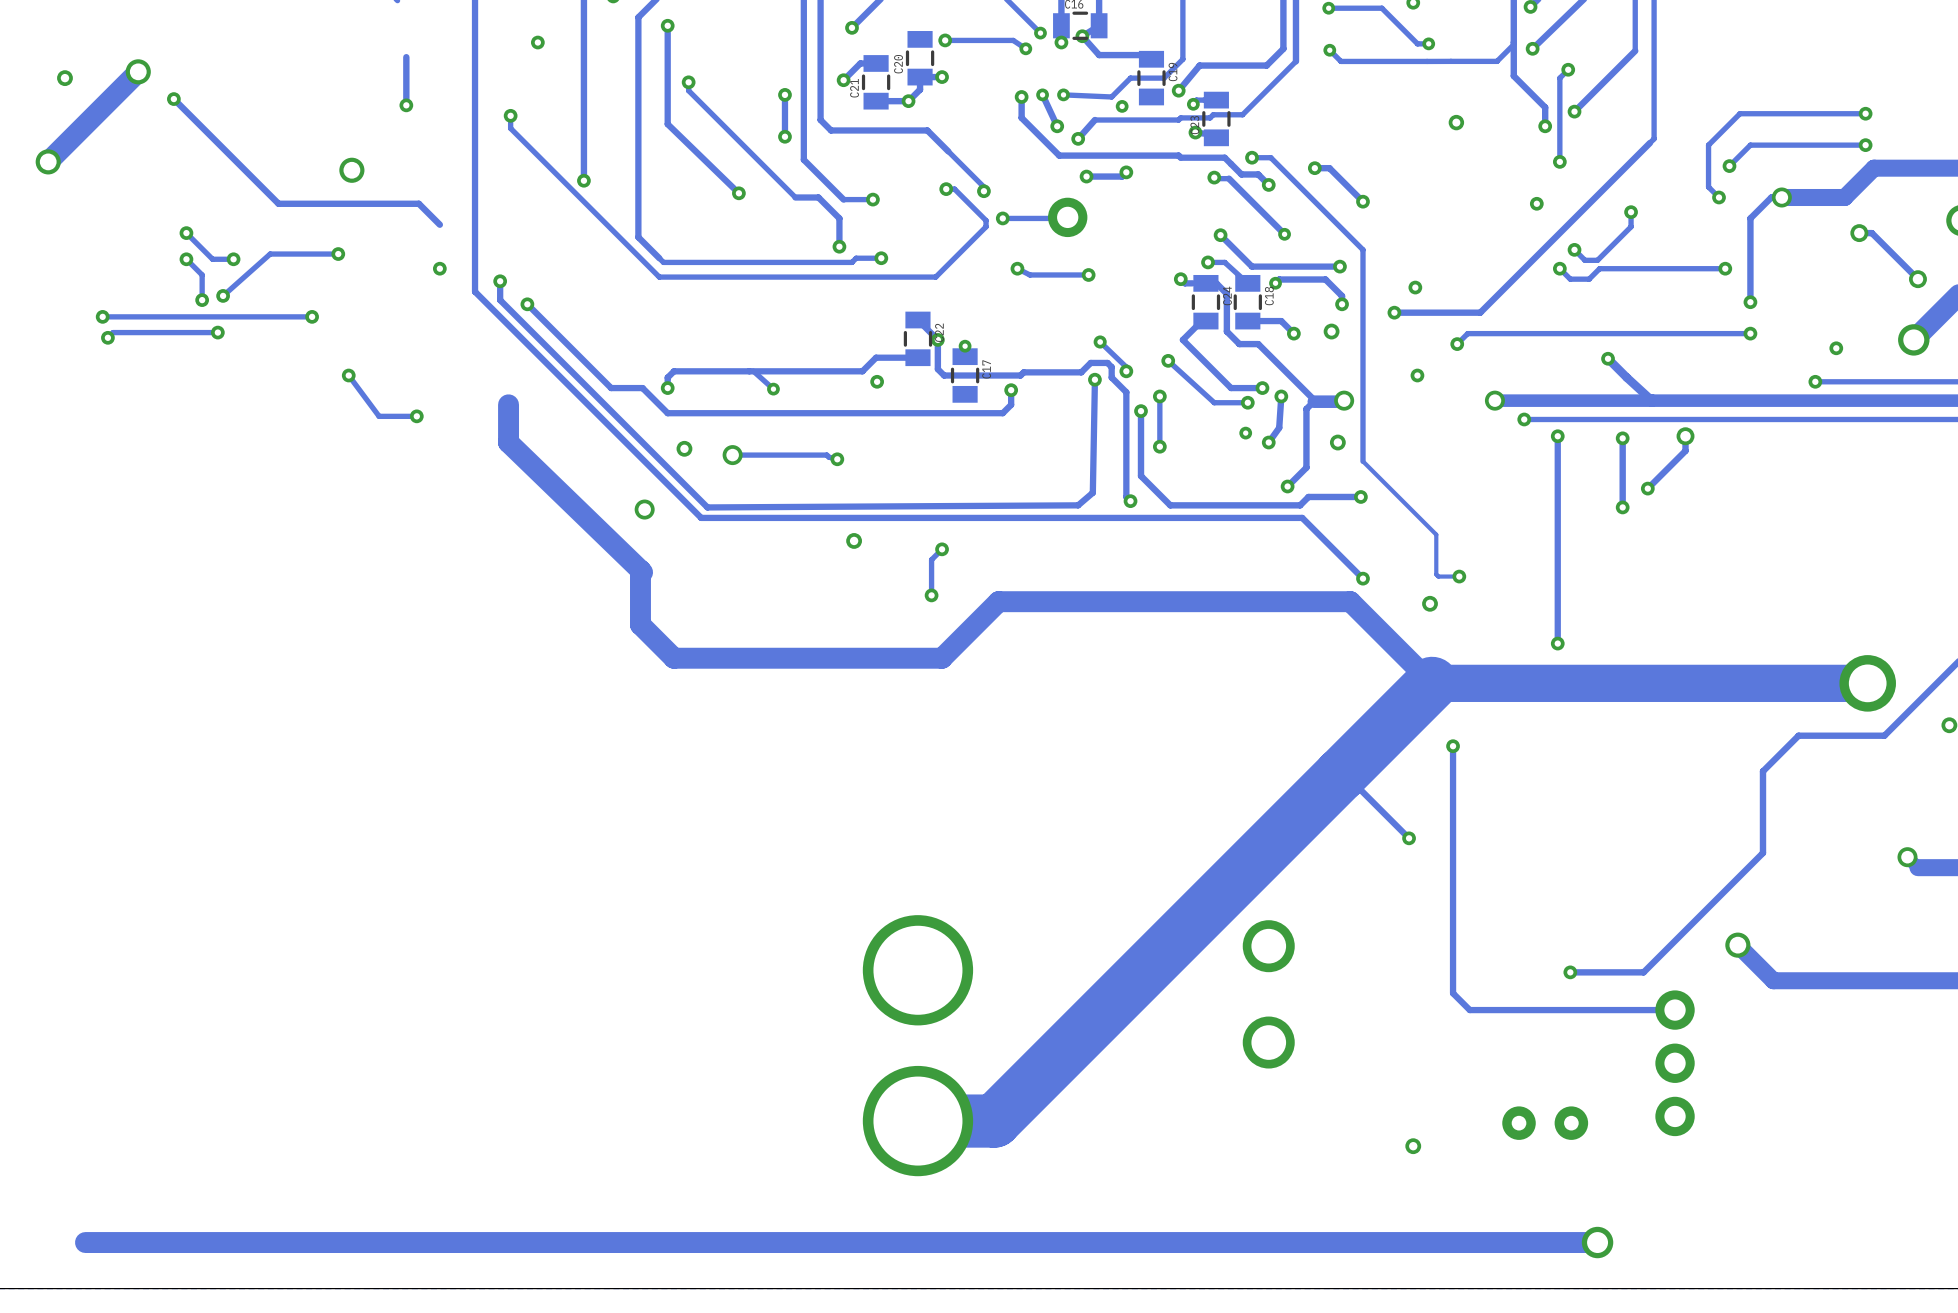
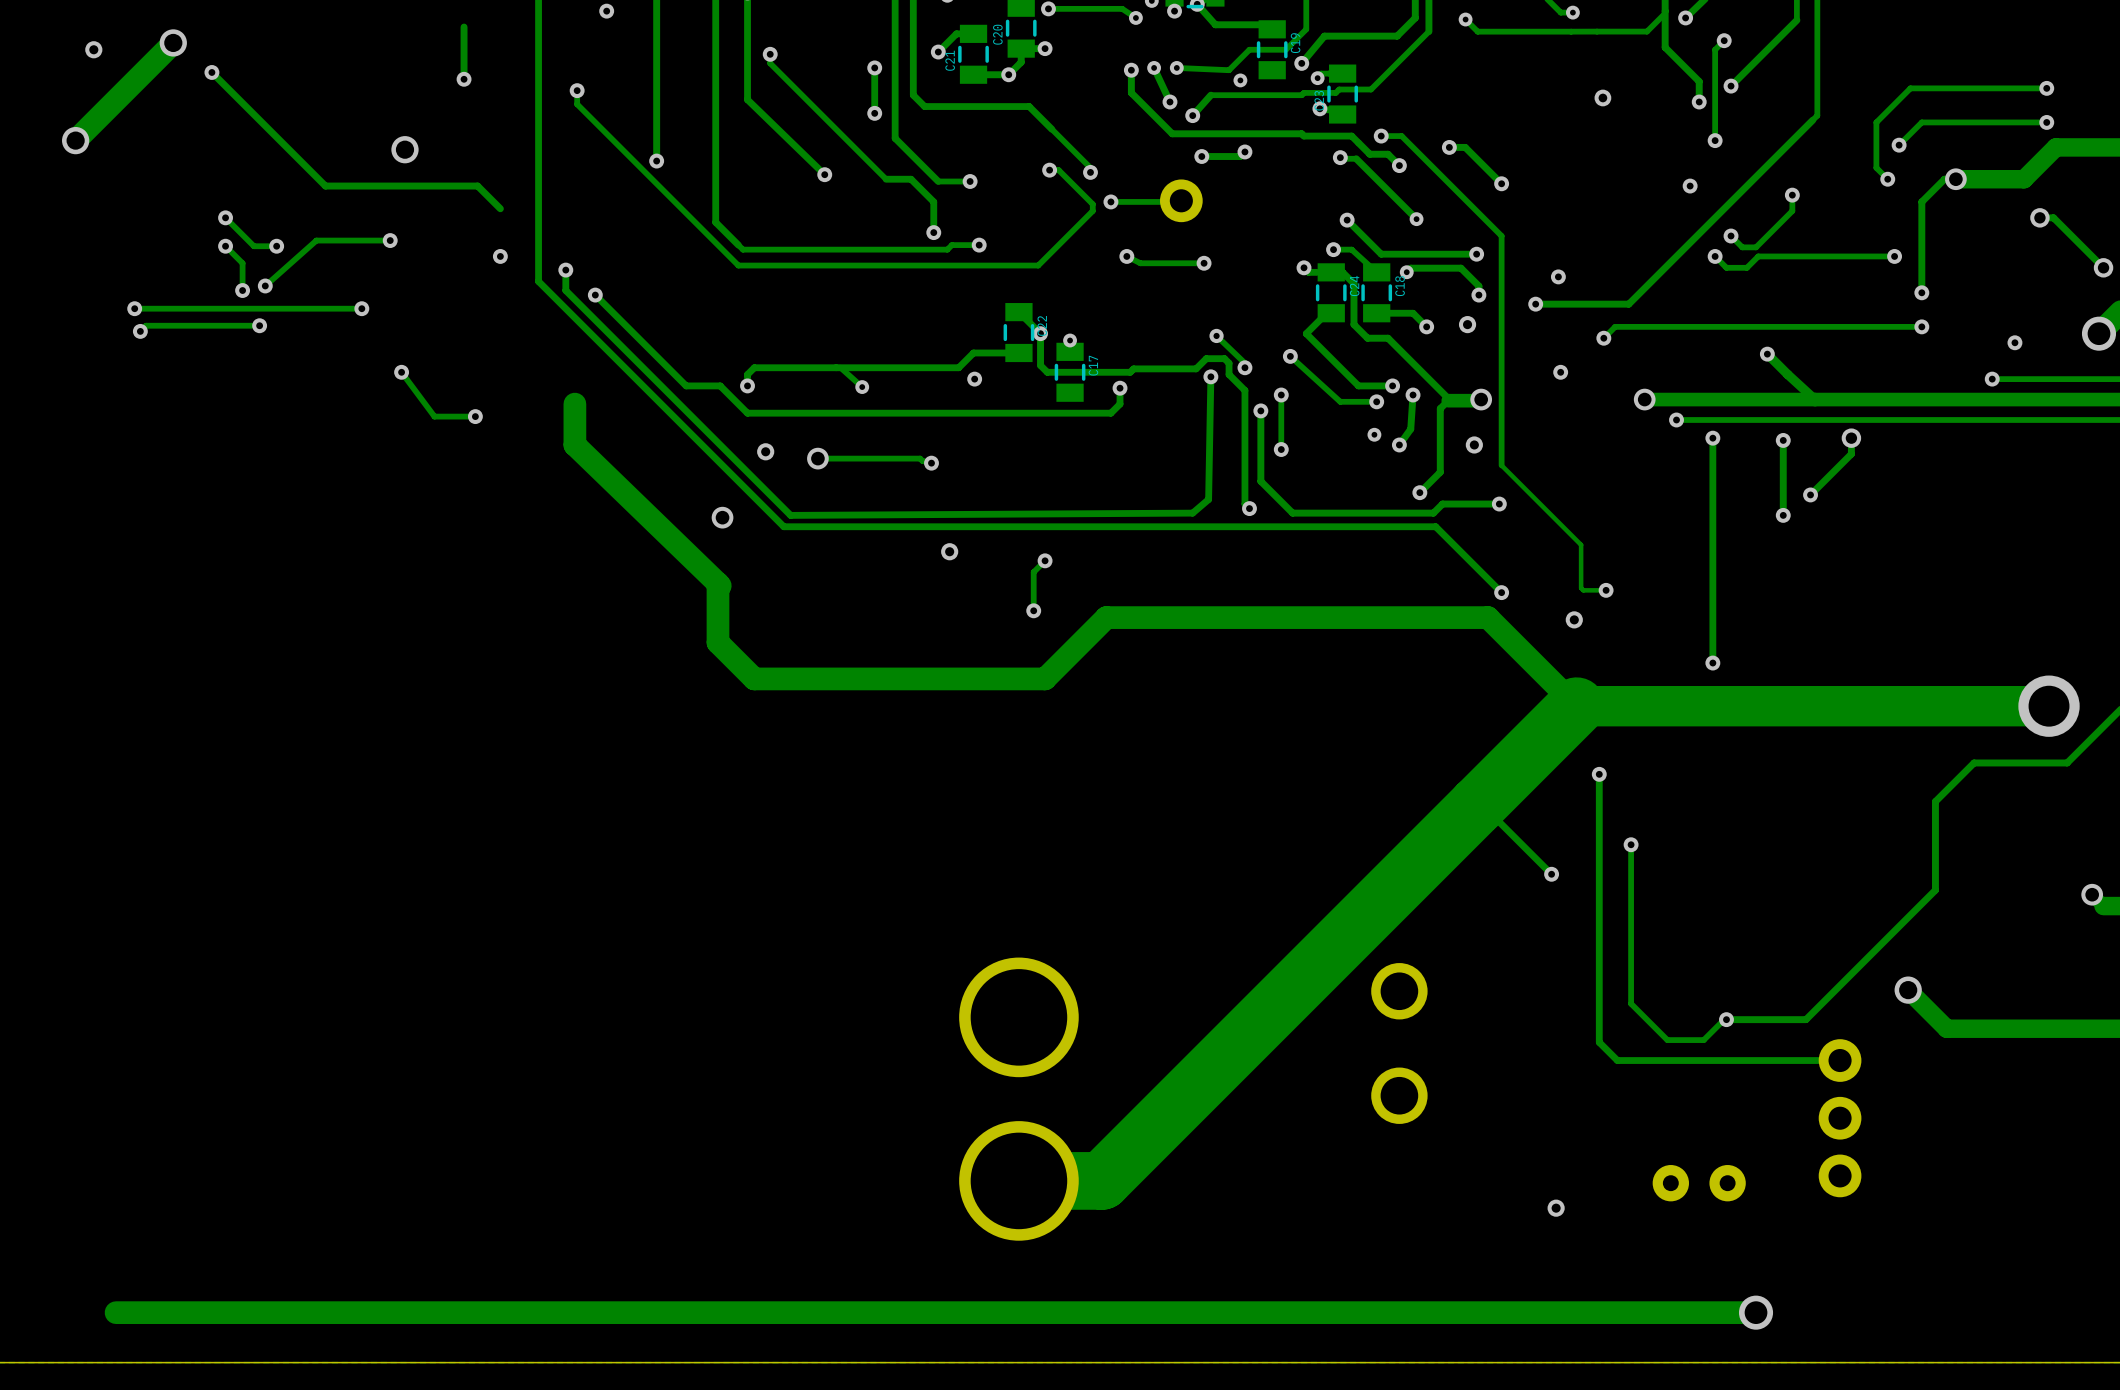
track: none -> (1631, 844) (1631, 1003) (1667, 1040) (1703, 1040) (1724, 1019) (1726, 1019)
via: none -> (1631, 844)

